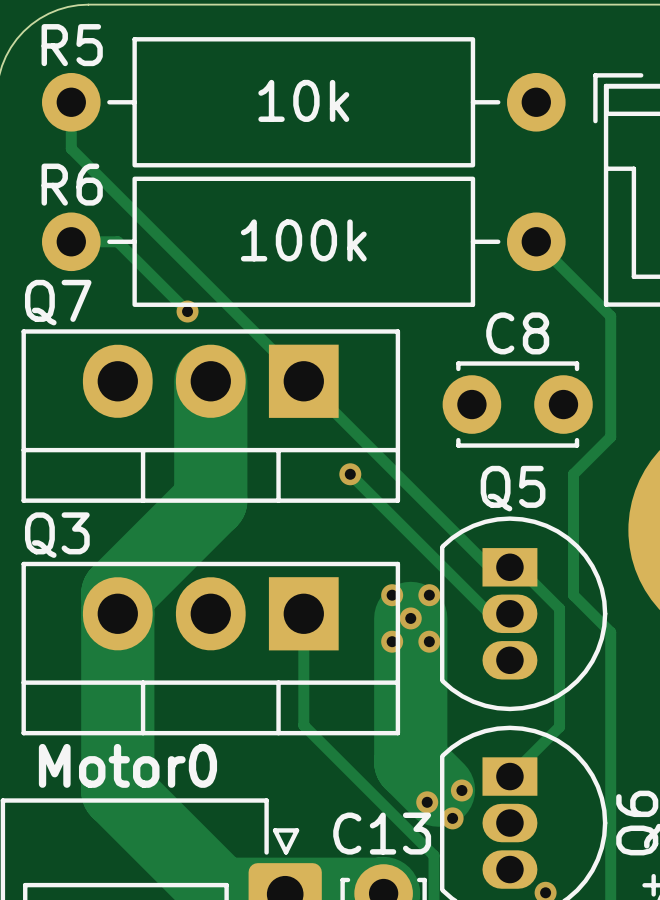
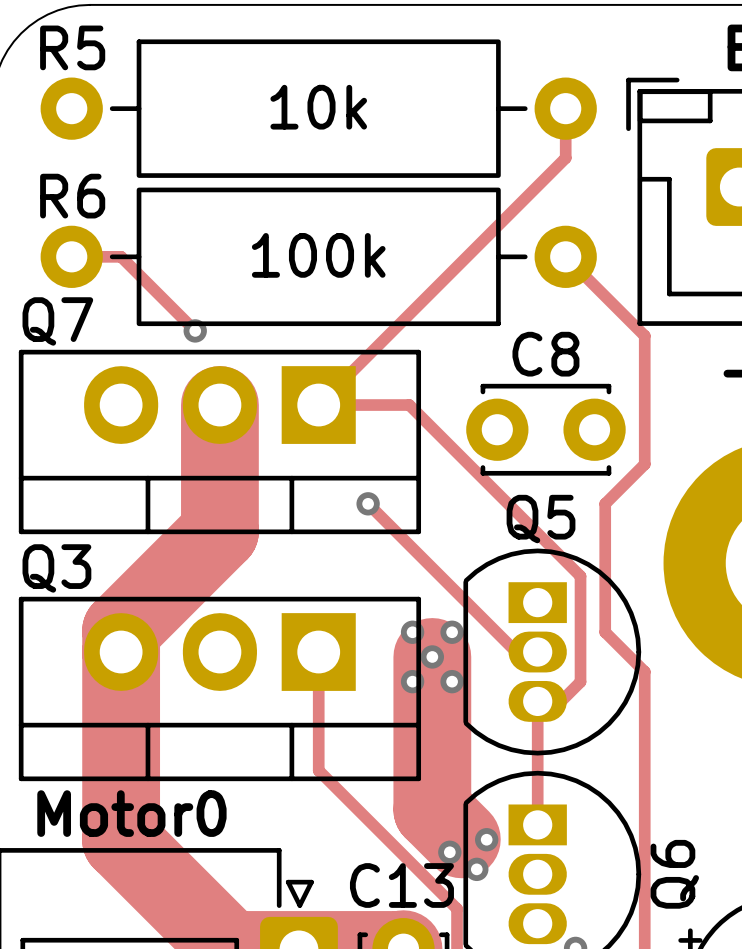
track: (71, 102) (71, 148) (489, 567) -> none
track: (518, 567) (559, 608) (559, 726) (509, 776) -> (565, 108) (565, 158) (318, 405) (409, 405) (580, 576) (580, 681) (561, 701) (537, 701) (537, 824)

